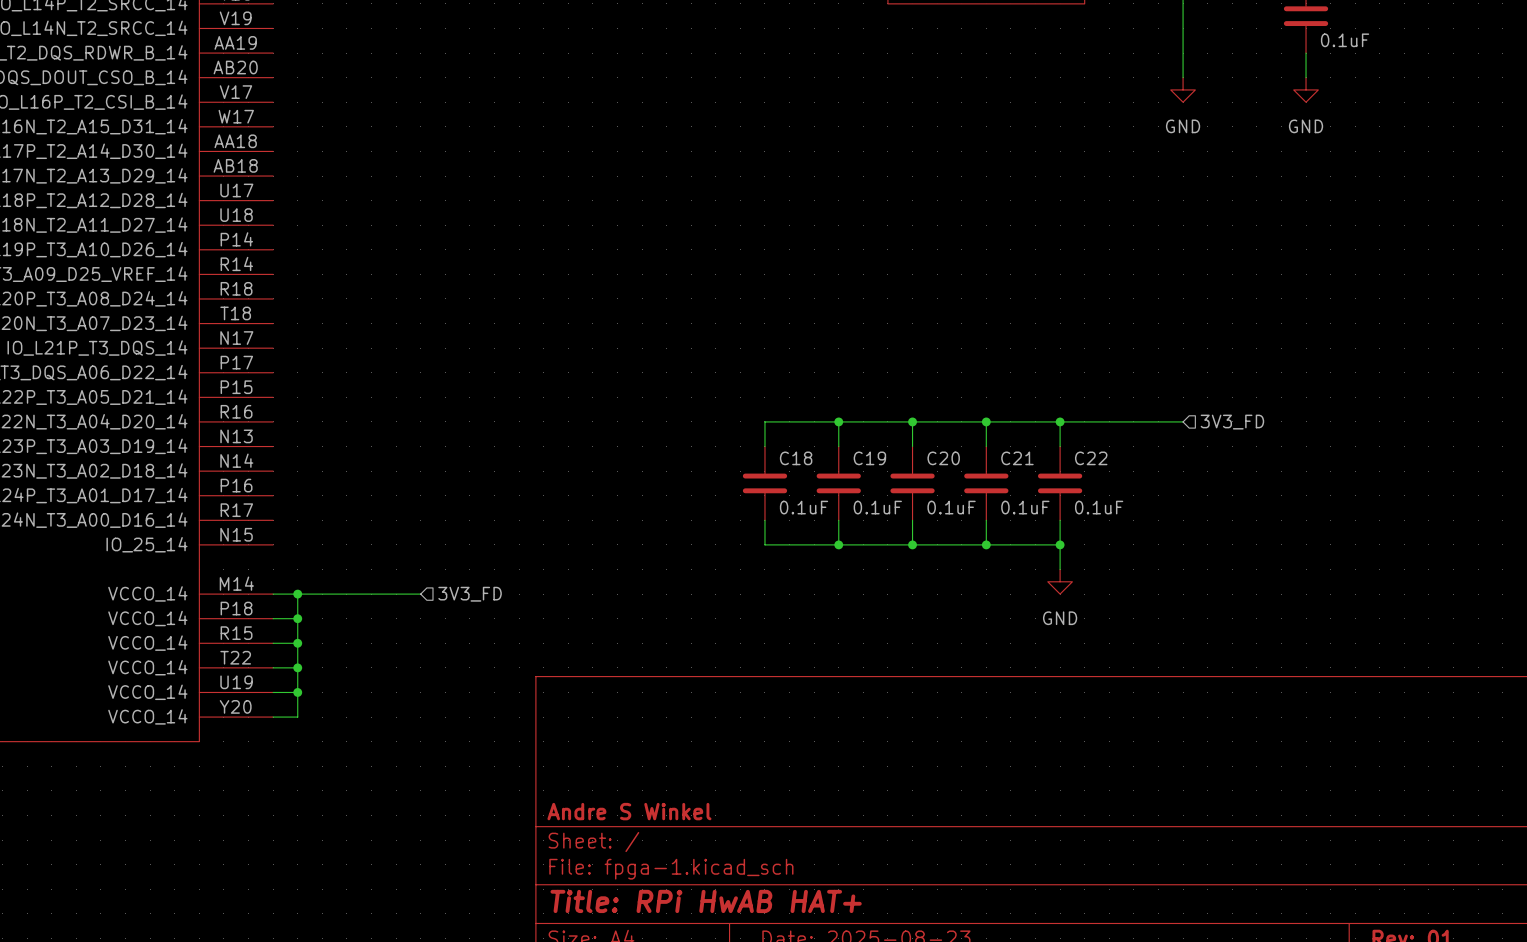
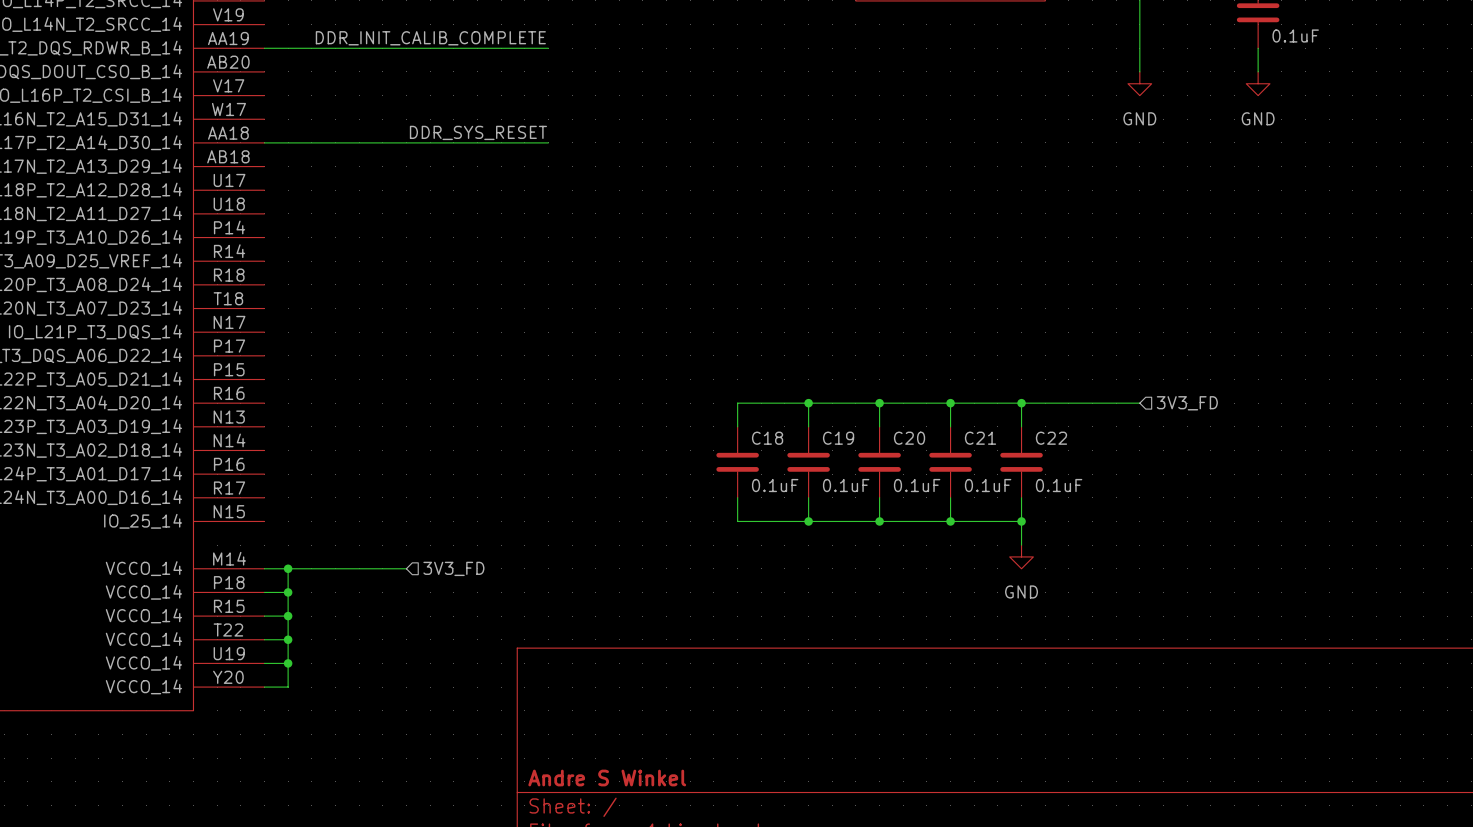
label: none -> DDR_INIT_CALIB_COMPLETE (430, 38)
wire: none -> (264, 48) (548, 48)
label: none -> DDR_SYS_RESET (478, 132)
wire: none -> (264, 142) (548, 142)

